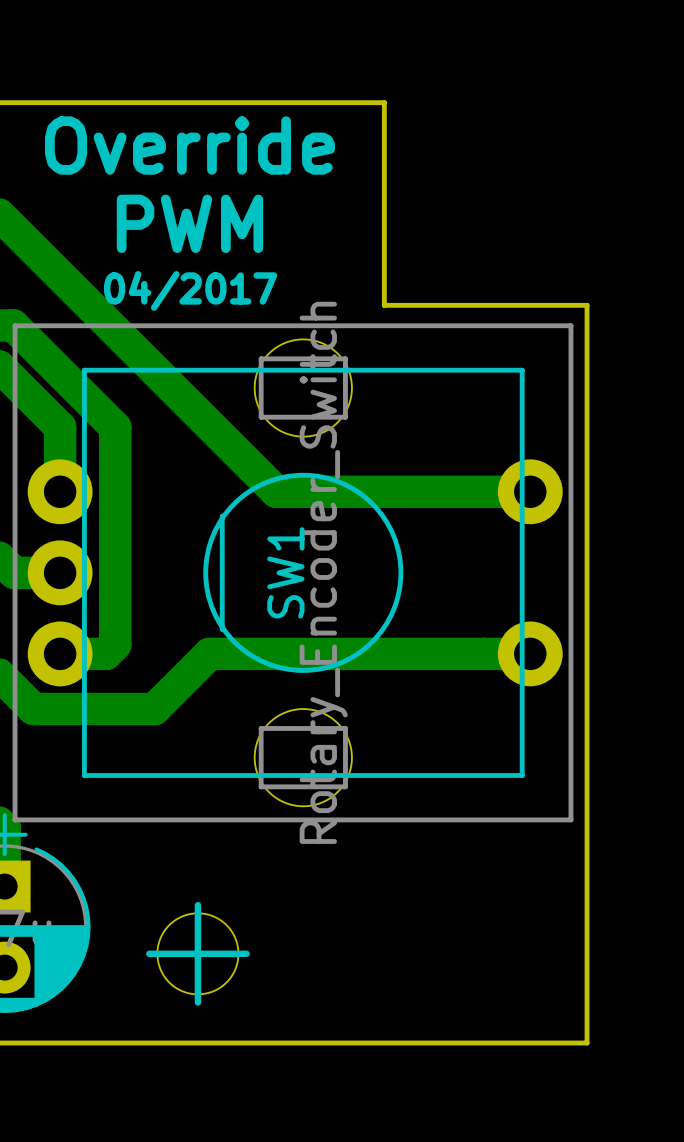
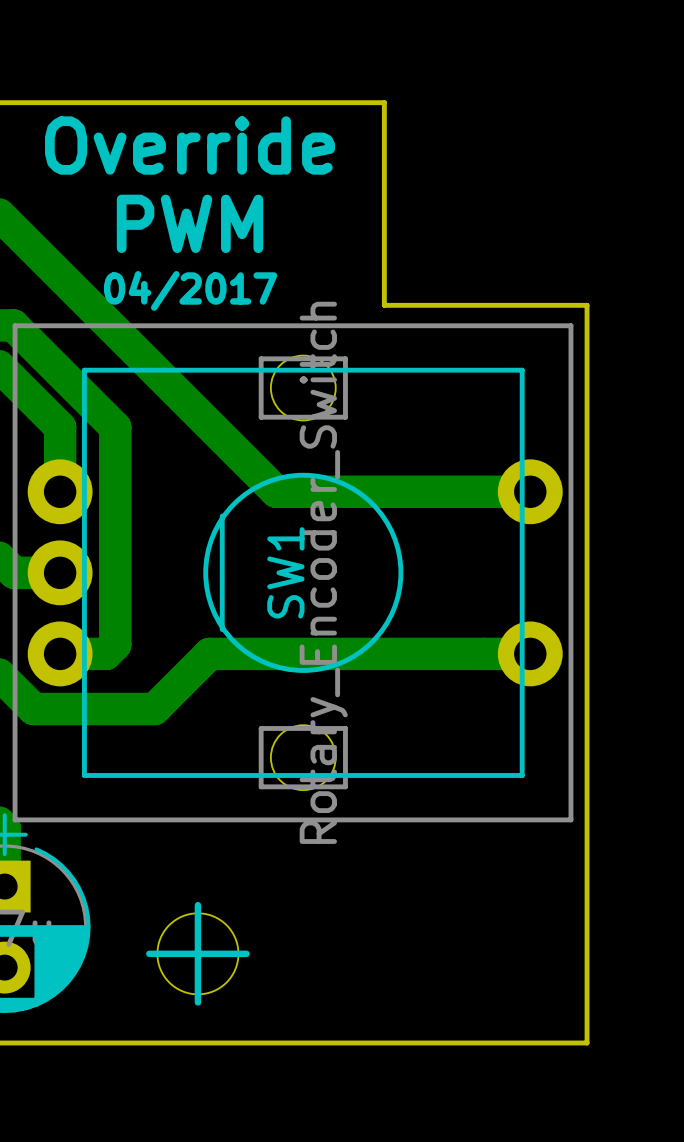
SW1 footprint: [12, 323, 574, 823] -> [12, 323, 574, 823]

